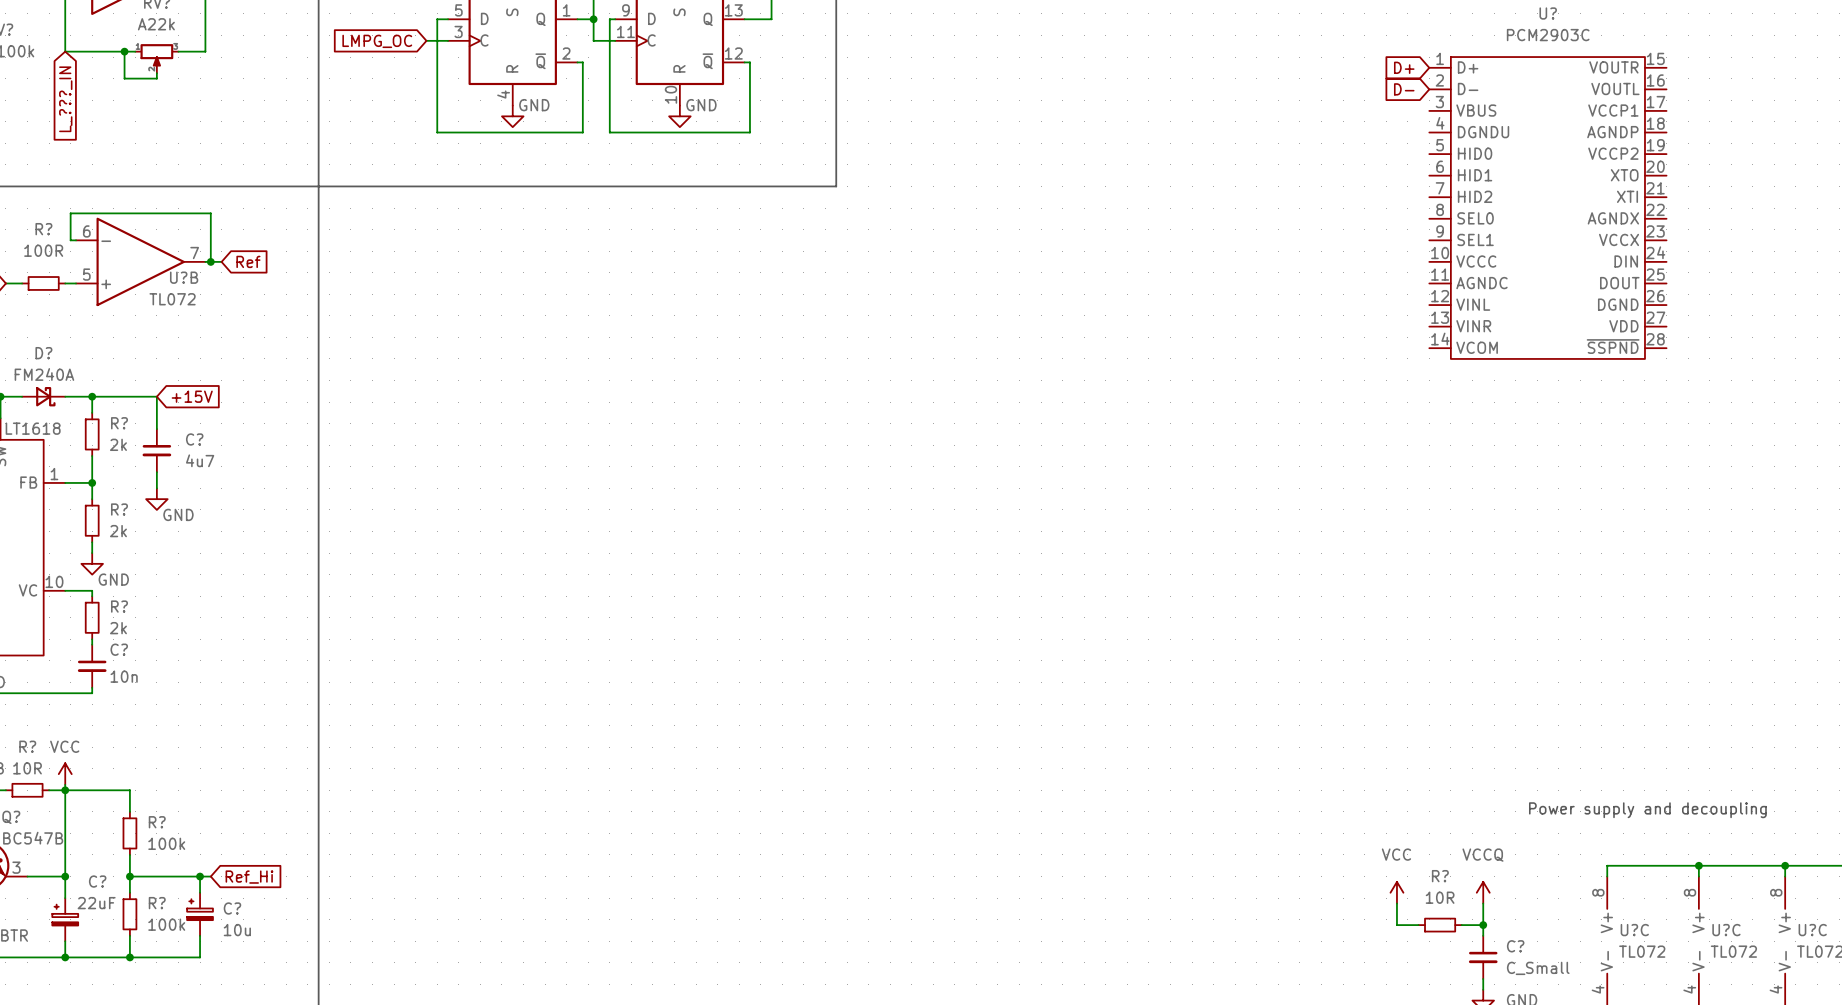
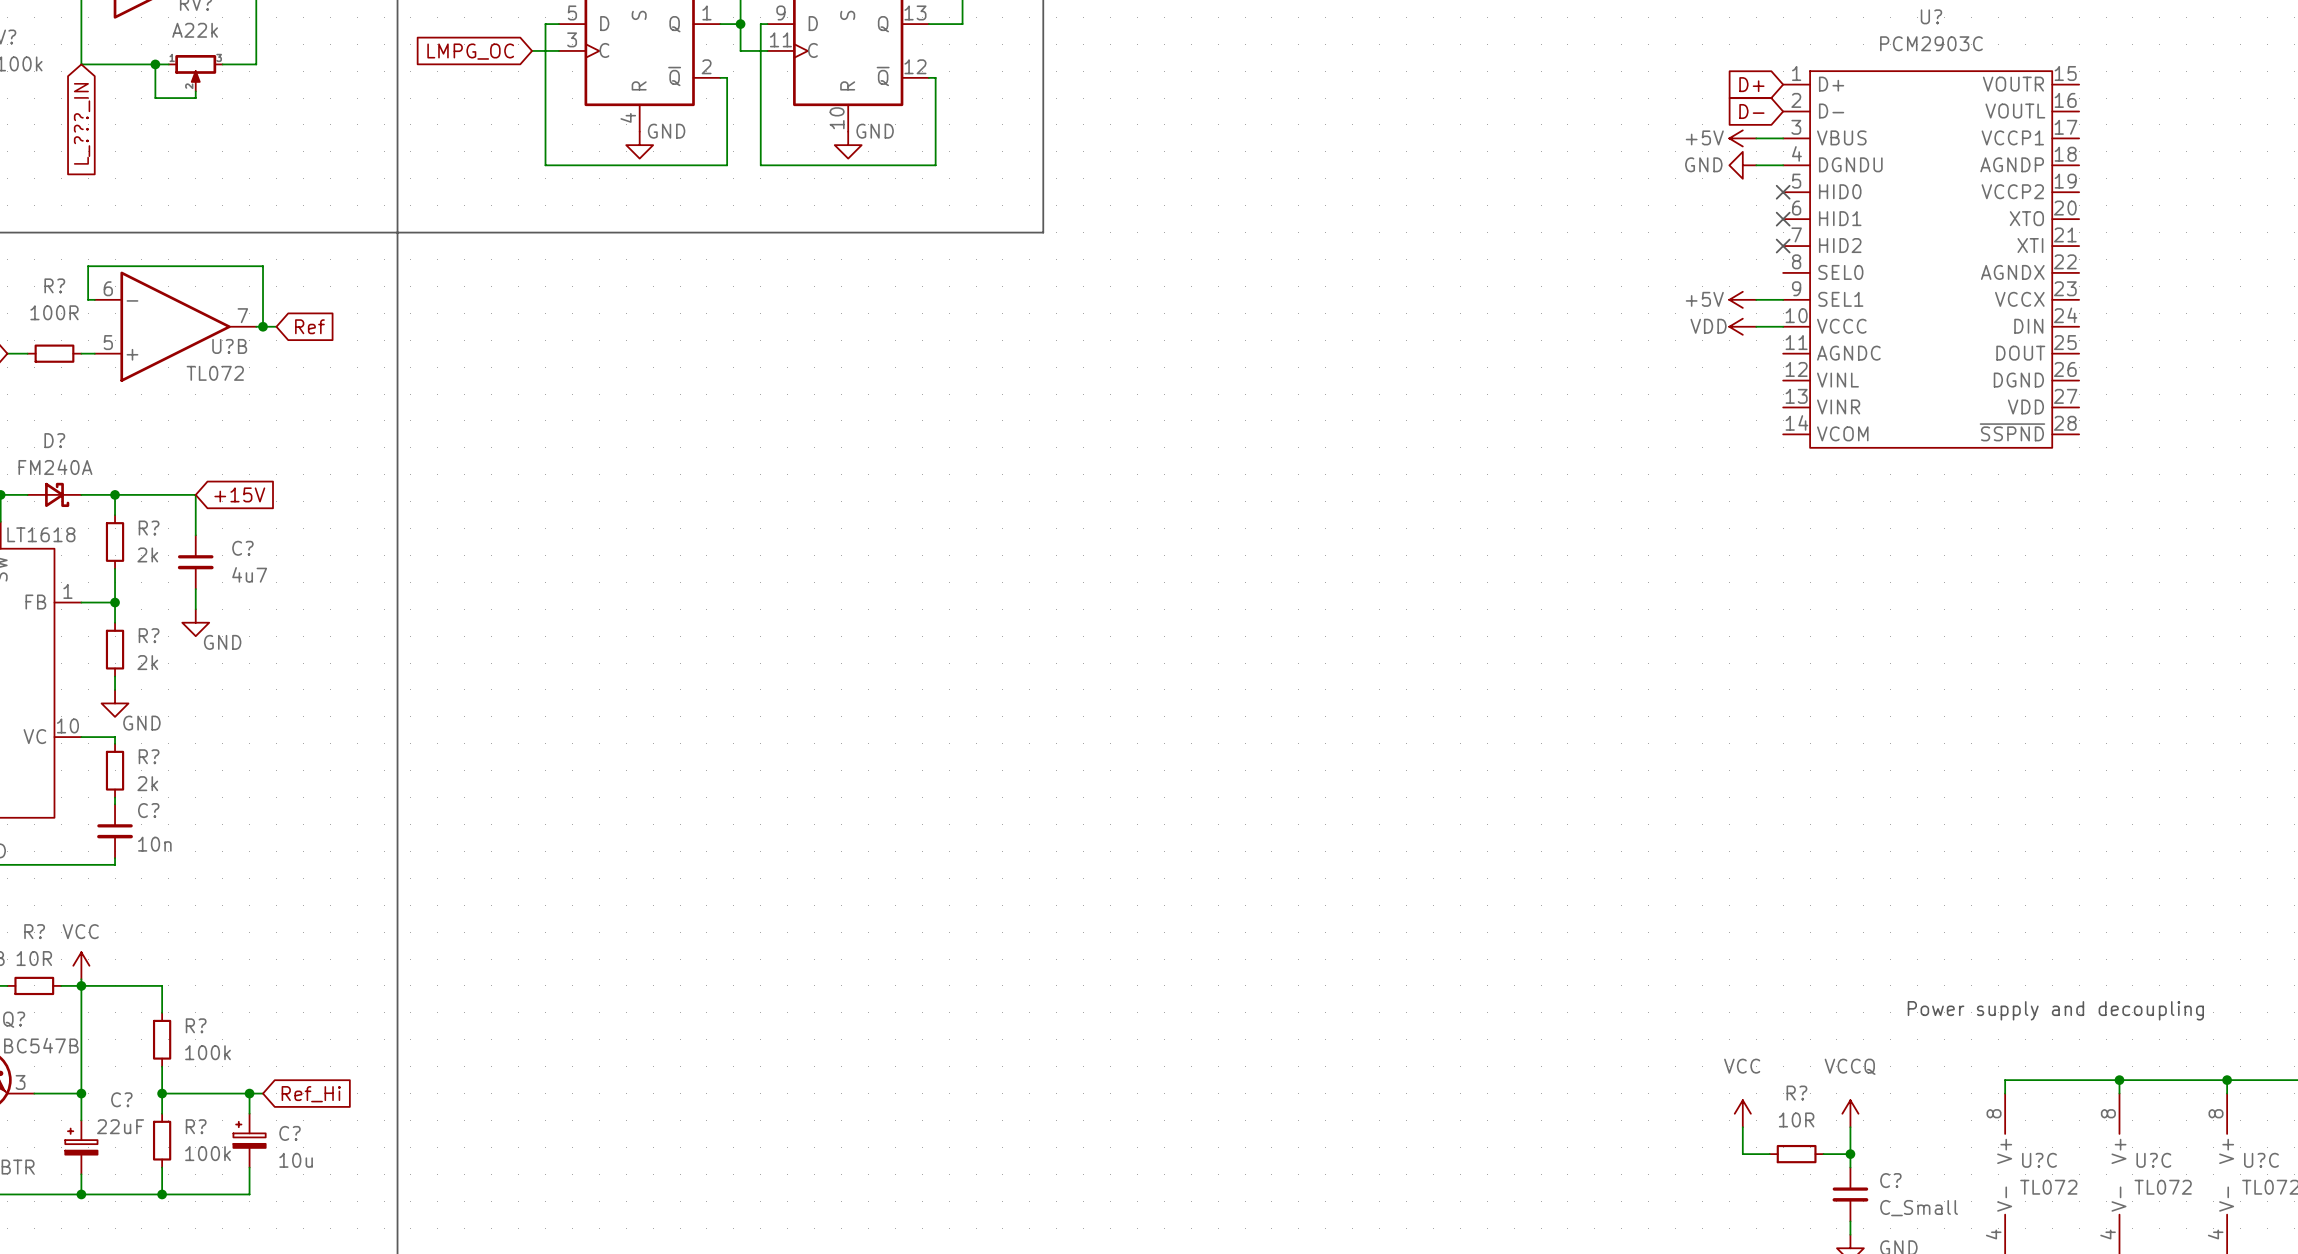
power symbol: none -> +5V (1742, 138)
wire: none -> (1756, 138) (1783, 138)
power symbol: none -> GND (1742, 165)
wire: none -> (1756, 165) (1783, 165)
no-connect mark: none -> (1783, 192)
no-connect mark: none -> (1783, 219)
no-connect mark: none -> (1783, 246)
power symbol: none -> +5V (1742, 299)
wire: none -> (1756, 299) (1783, 299)
power symbol: none -> VDD (1742, 326)
wire: none -> (1756, 326) (1783, 326)

